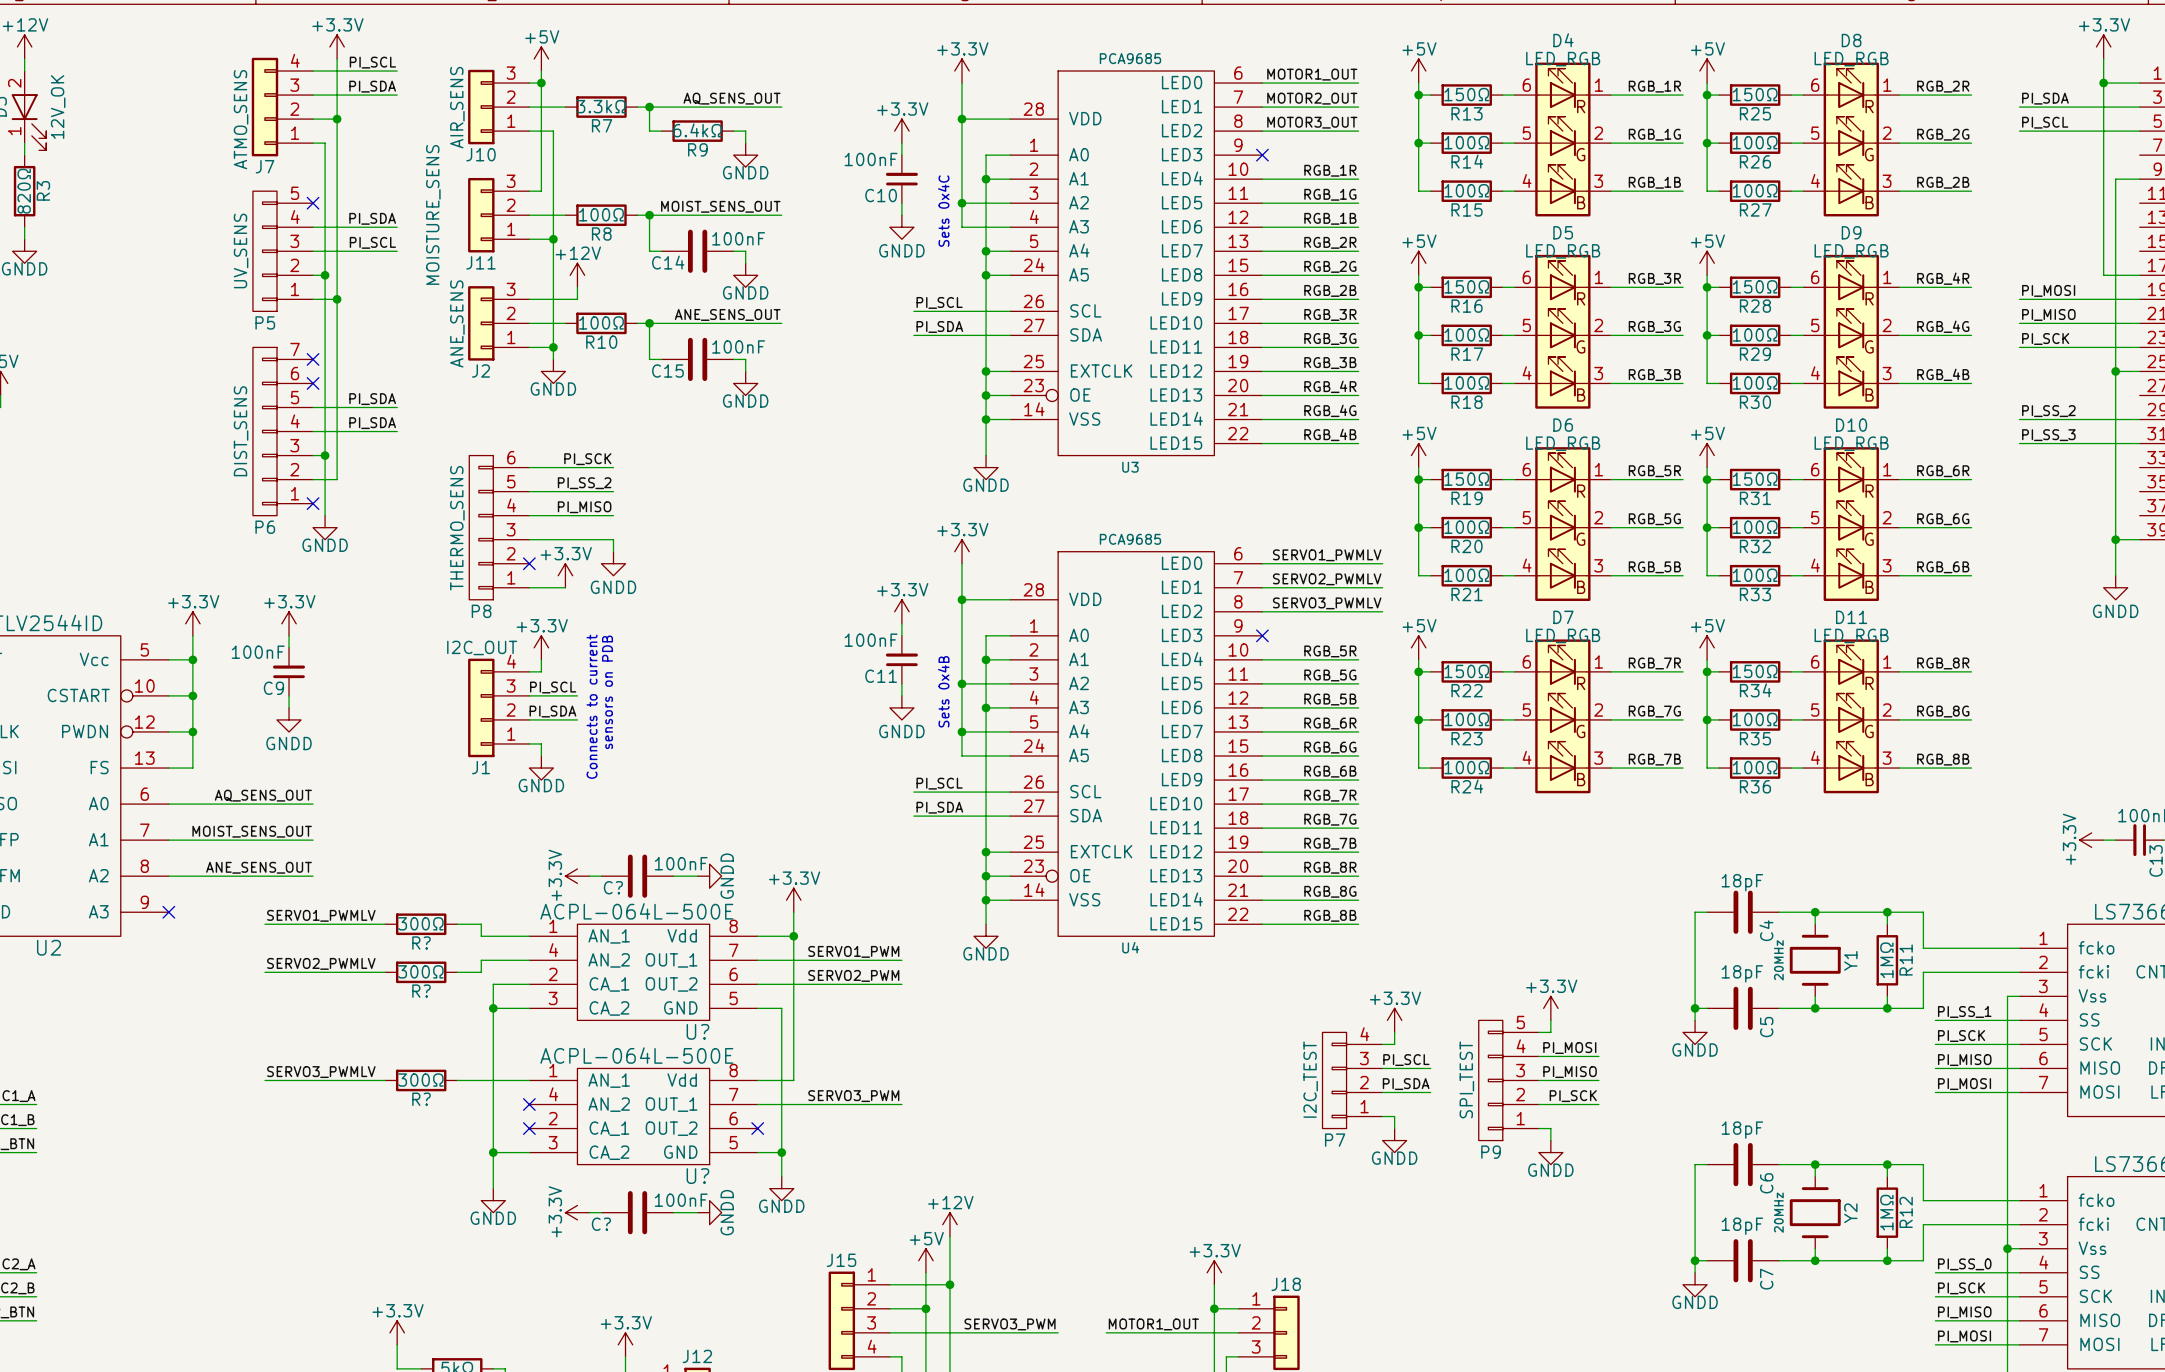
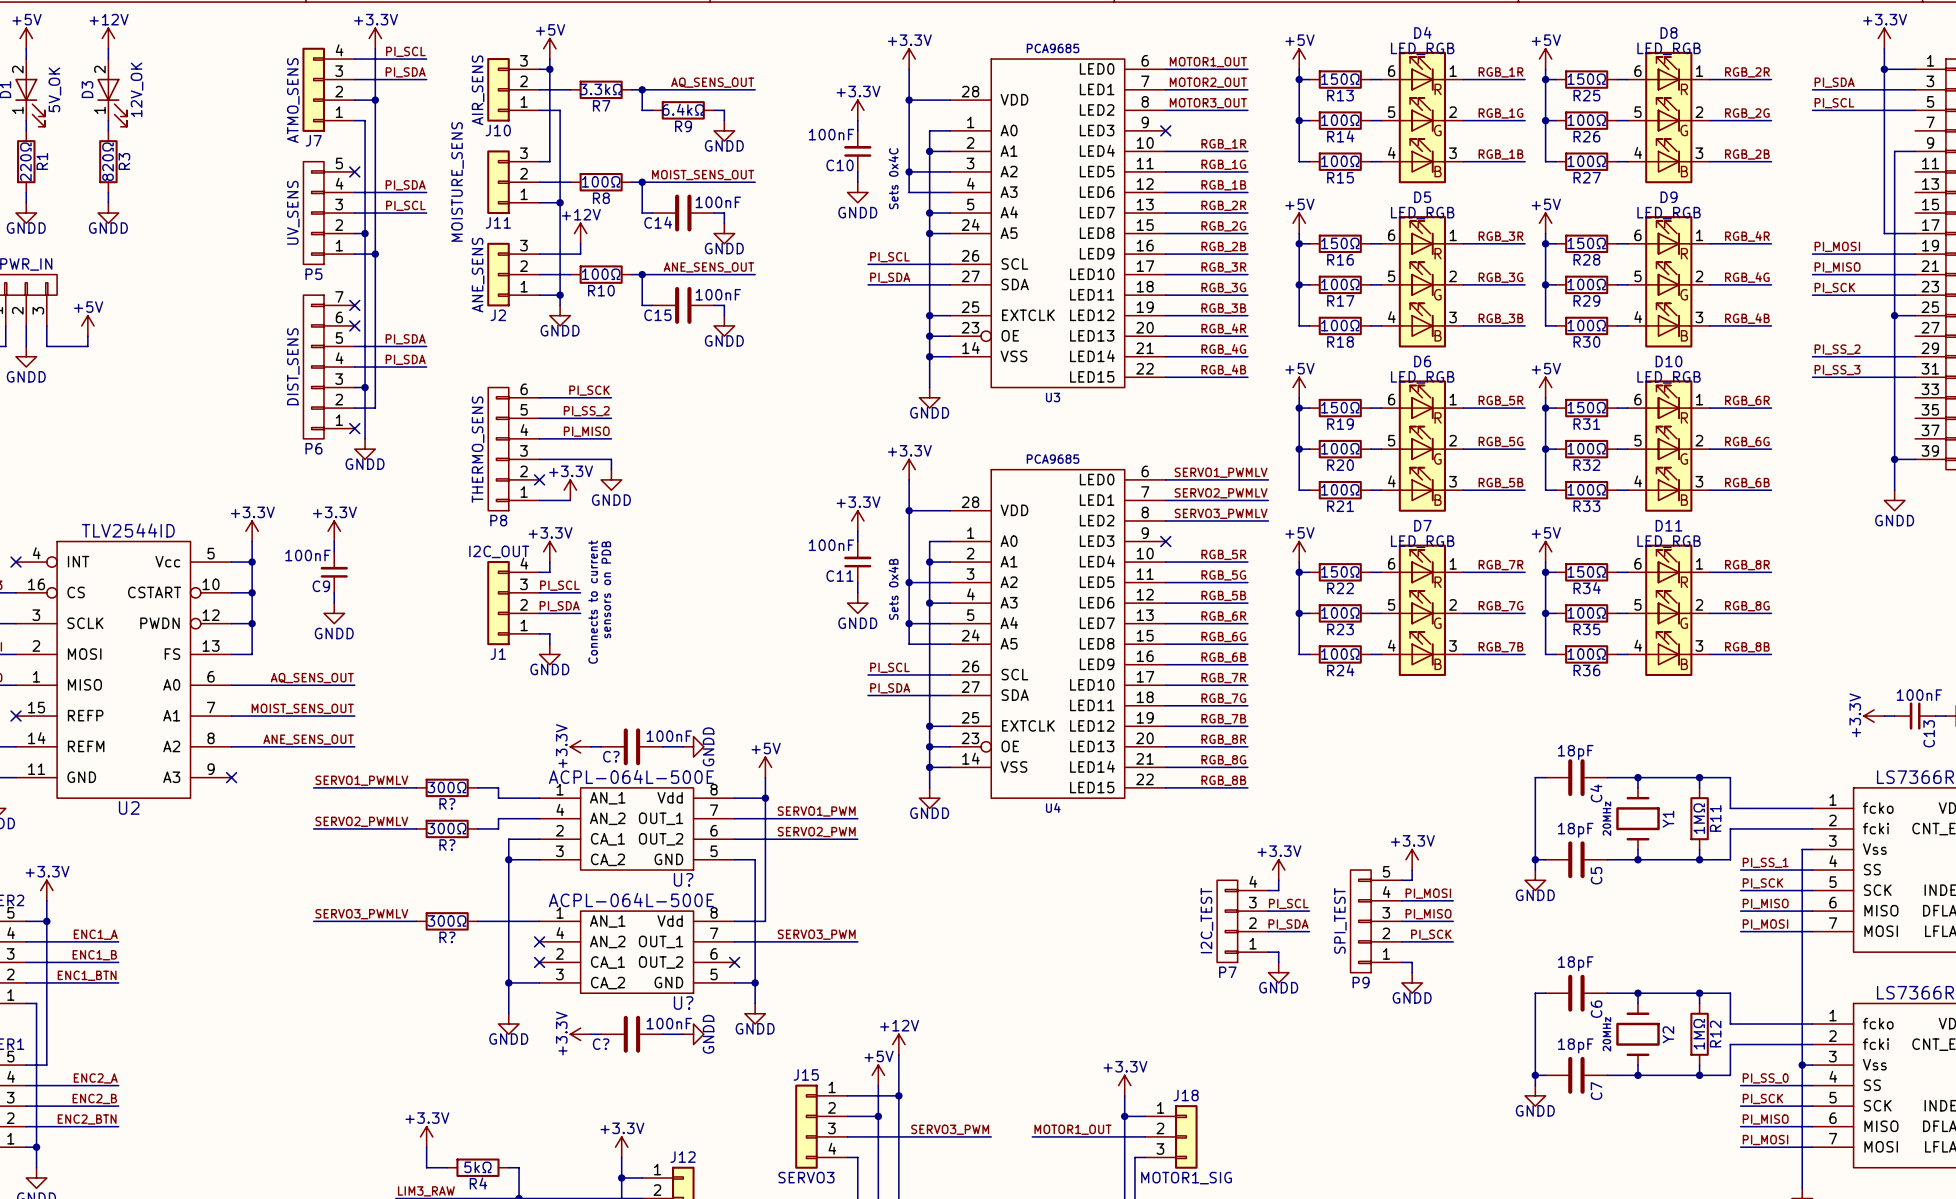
power symbol: +3.3V (793, 900) -> +5V (765, 767)

